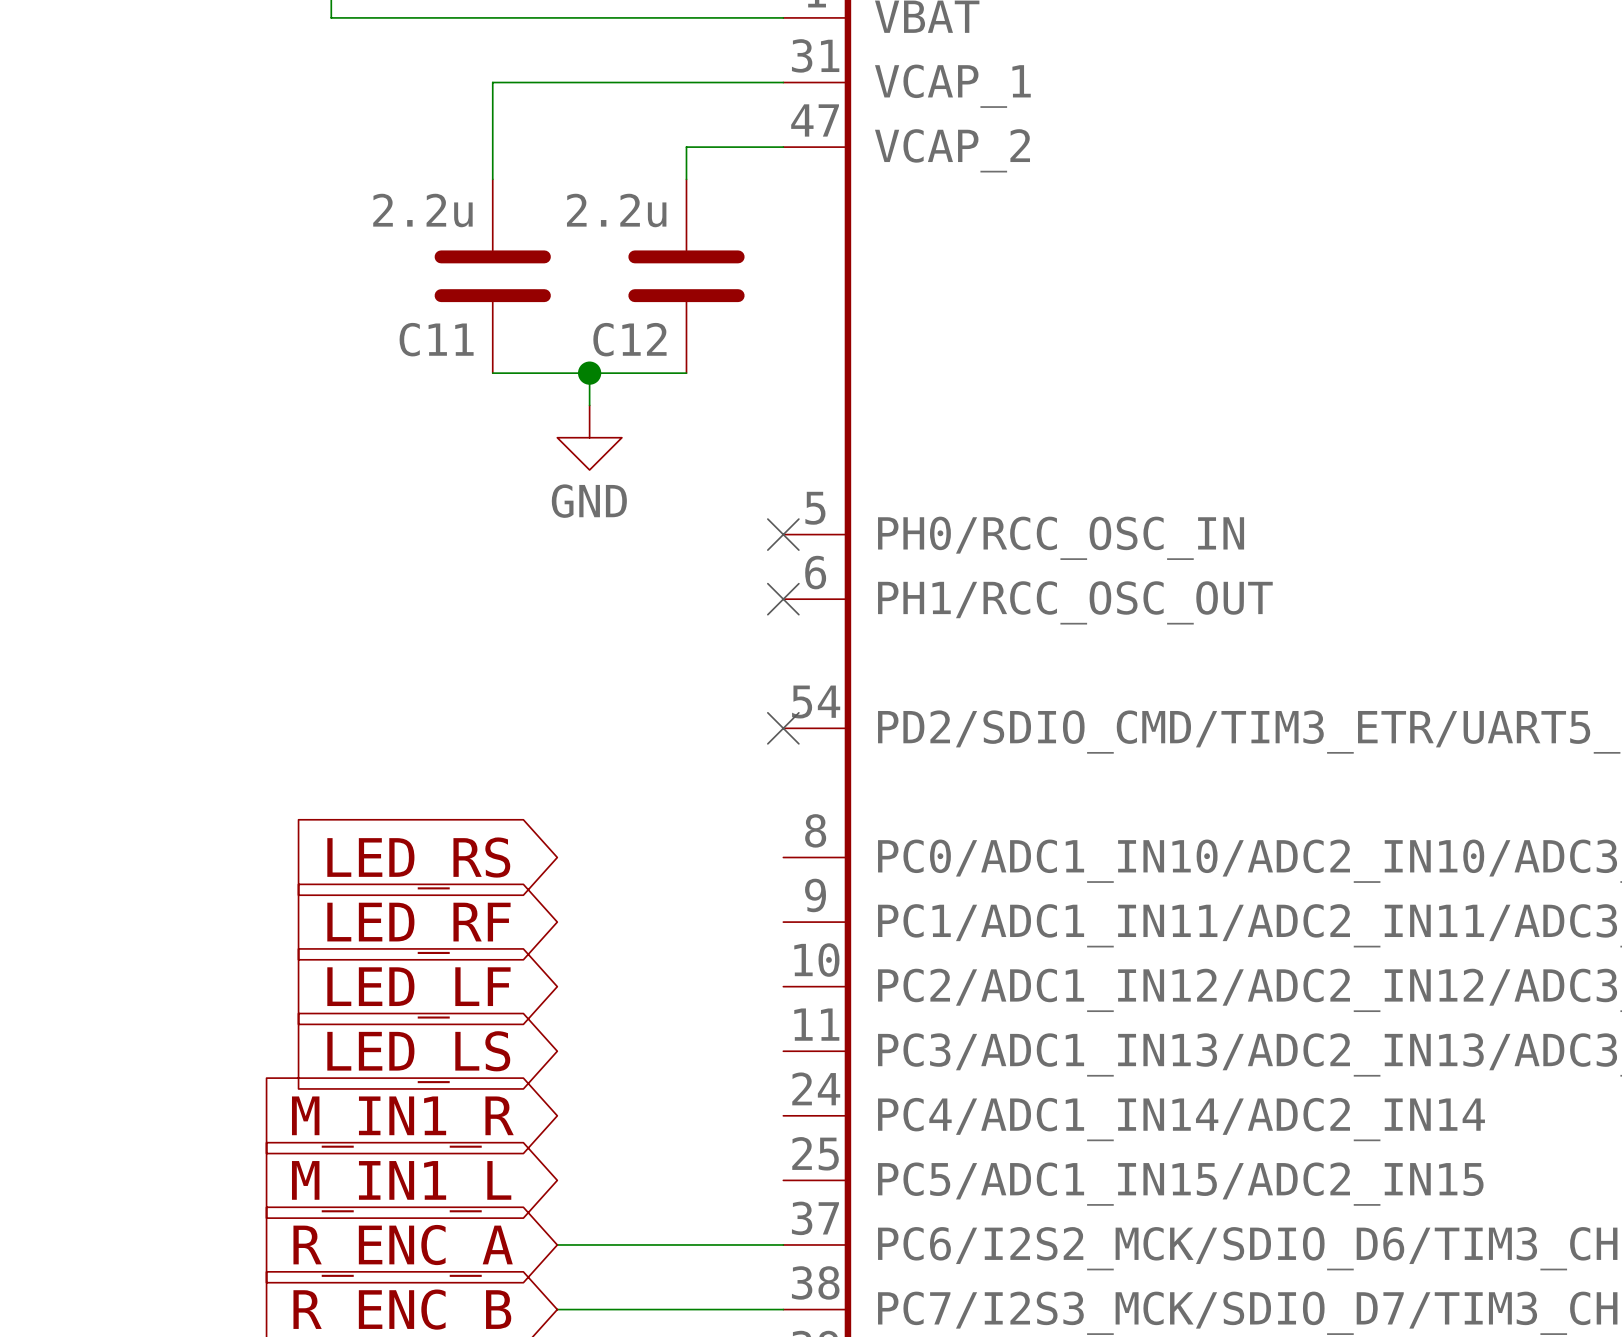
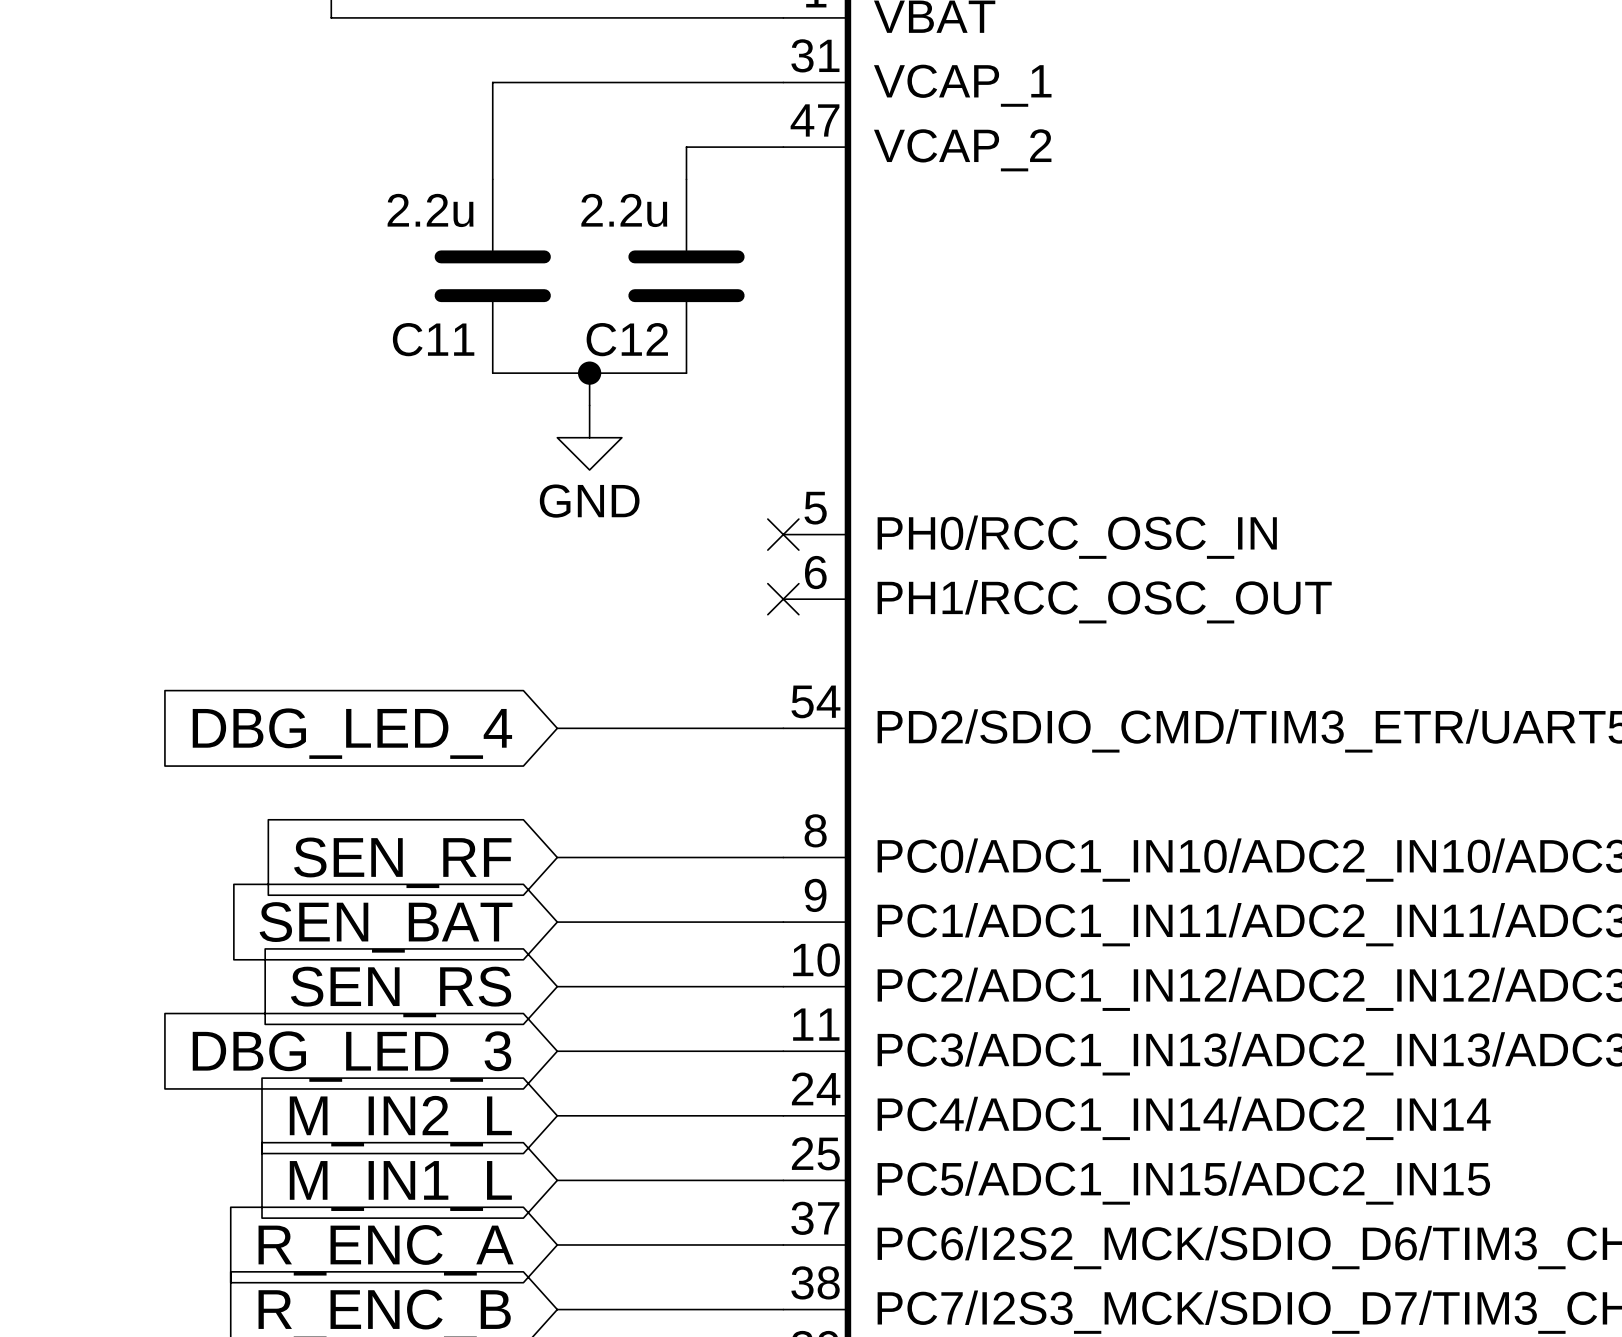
wire: none -> (557, 728) (783, 728)
no-connect mark: (783, 728) -> none
global label: none -> DBG_LED_4 (352, 733)
wire: none -> (557, 857) (783, 857)
global label: LED_RS (418, 863) -> SEN_RF (402, 862)
wire: none -> (557, 922) (783, 922)
global label: LED_RF (418, 928) -> SEN_BAT (386, 927)
wire: none -> (557, 986) (783, 986)
global label: LED_LF (418, 992) -> SEN_RS (401, 991)
wire: none -> (557, 1051) (783, 1051)
global label: LED_LS (418, 1057) -> DBG_LED_3 (352, 1056)
wire: none -> (557, 1115) (783, 1115)
global label: M_IN1_R (402, 1122) -> M_IN2_L (400, 1121)
wire: none -> (557, 1180) (783, 1180)

